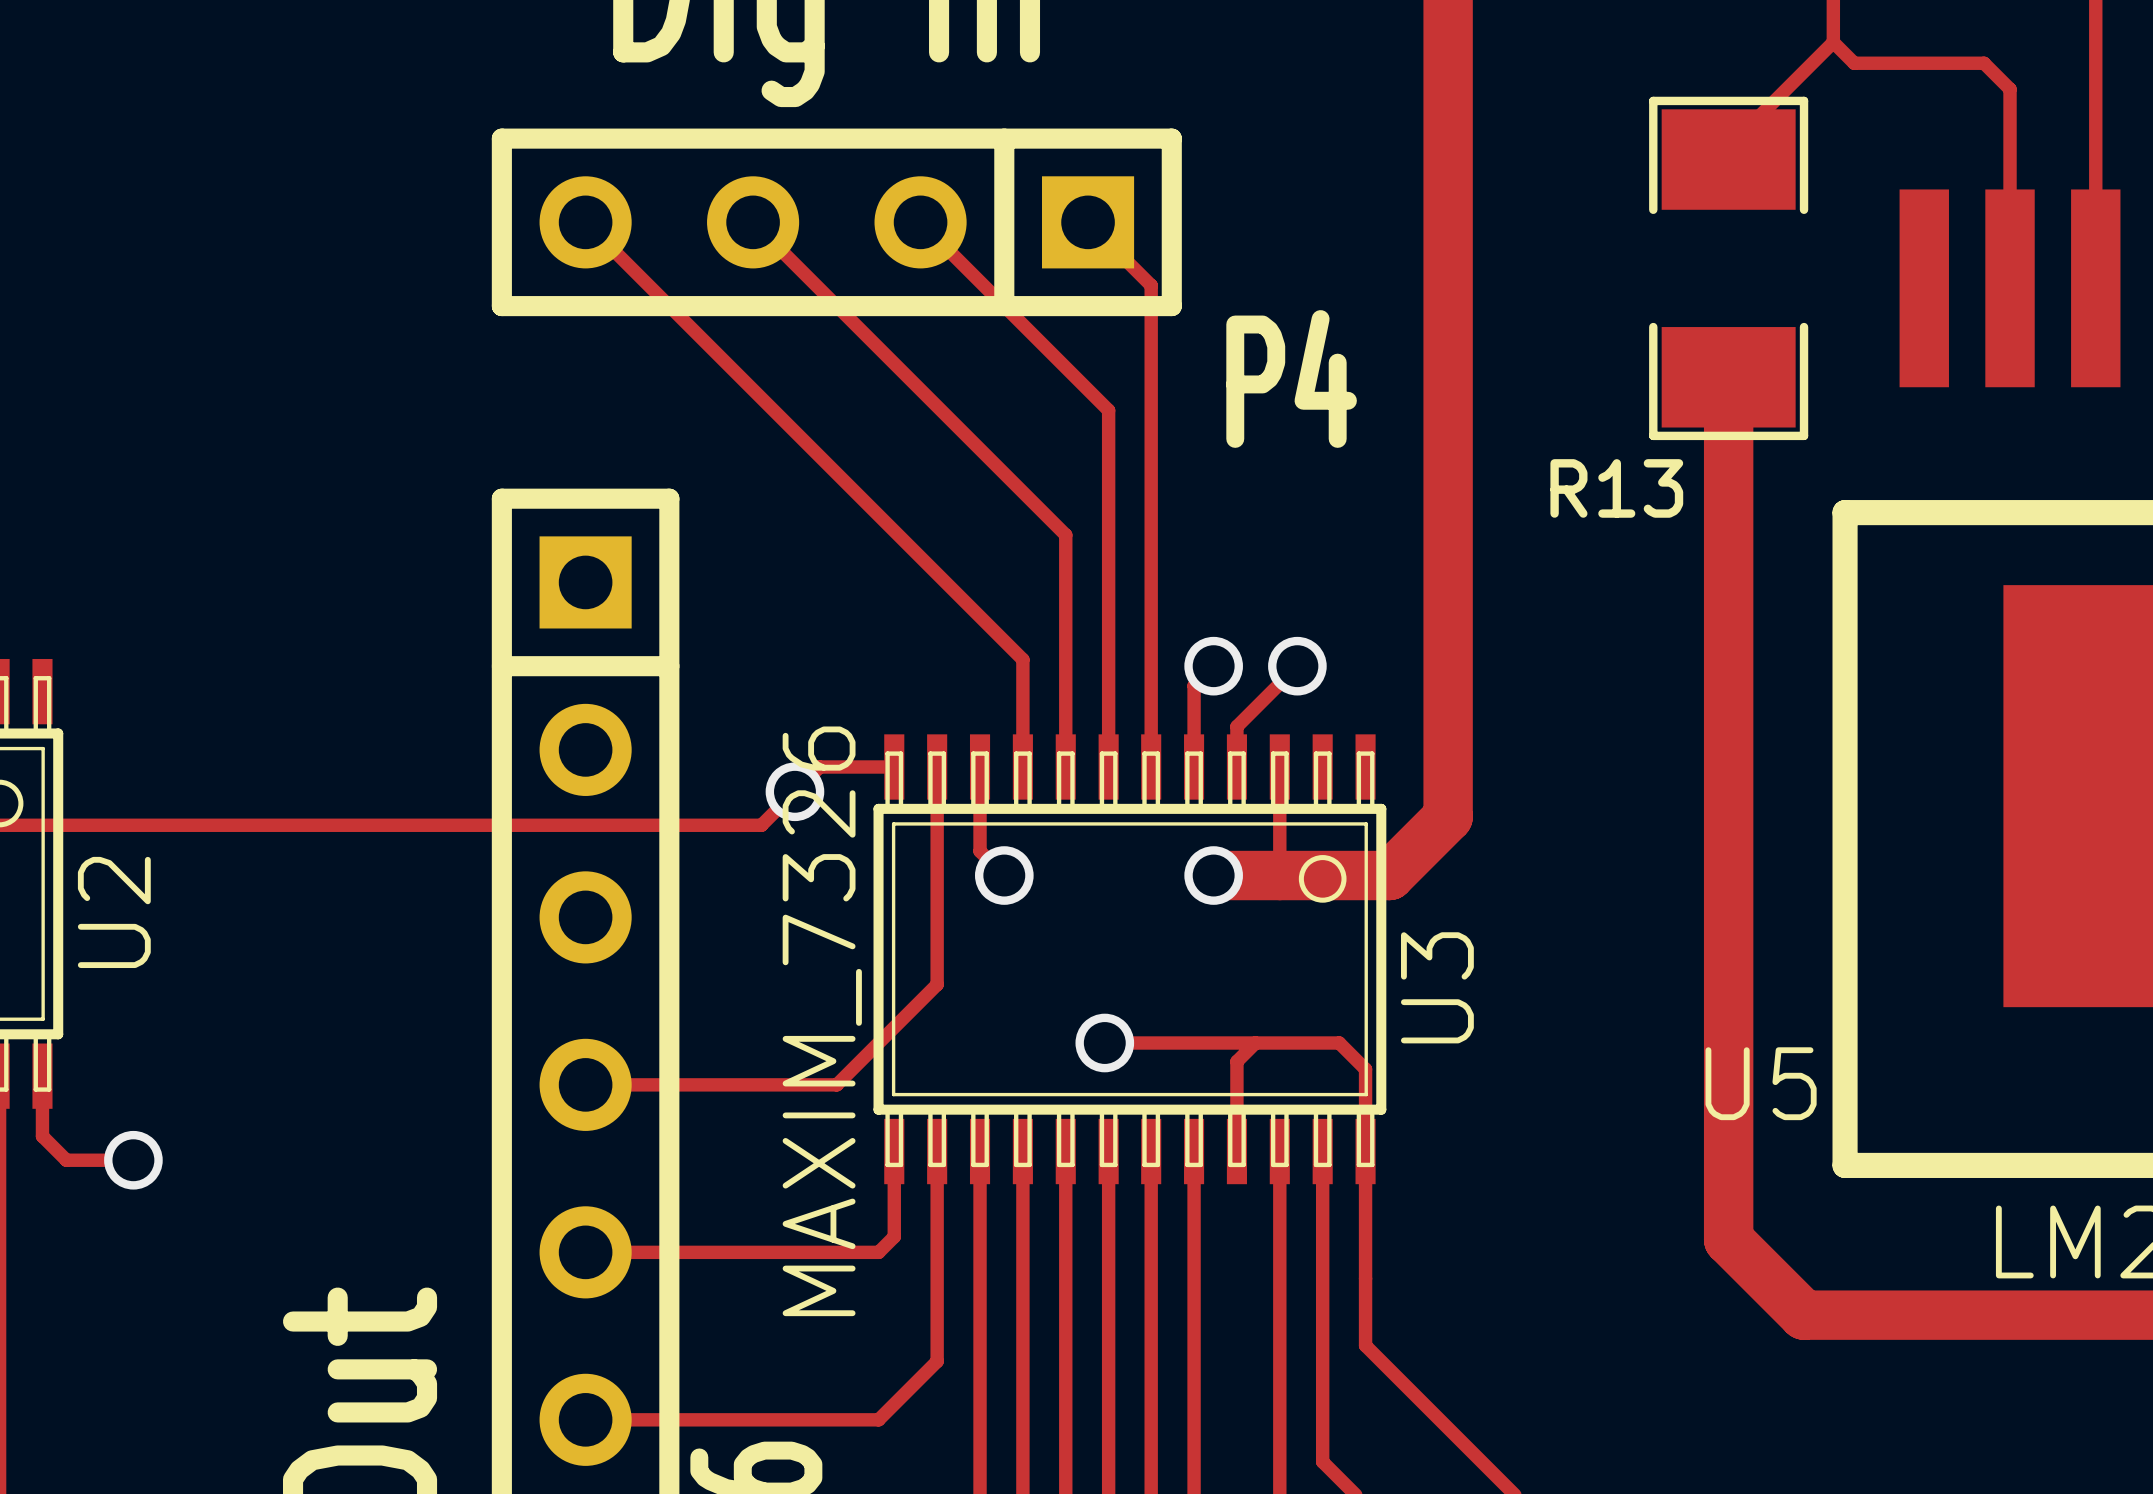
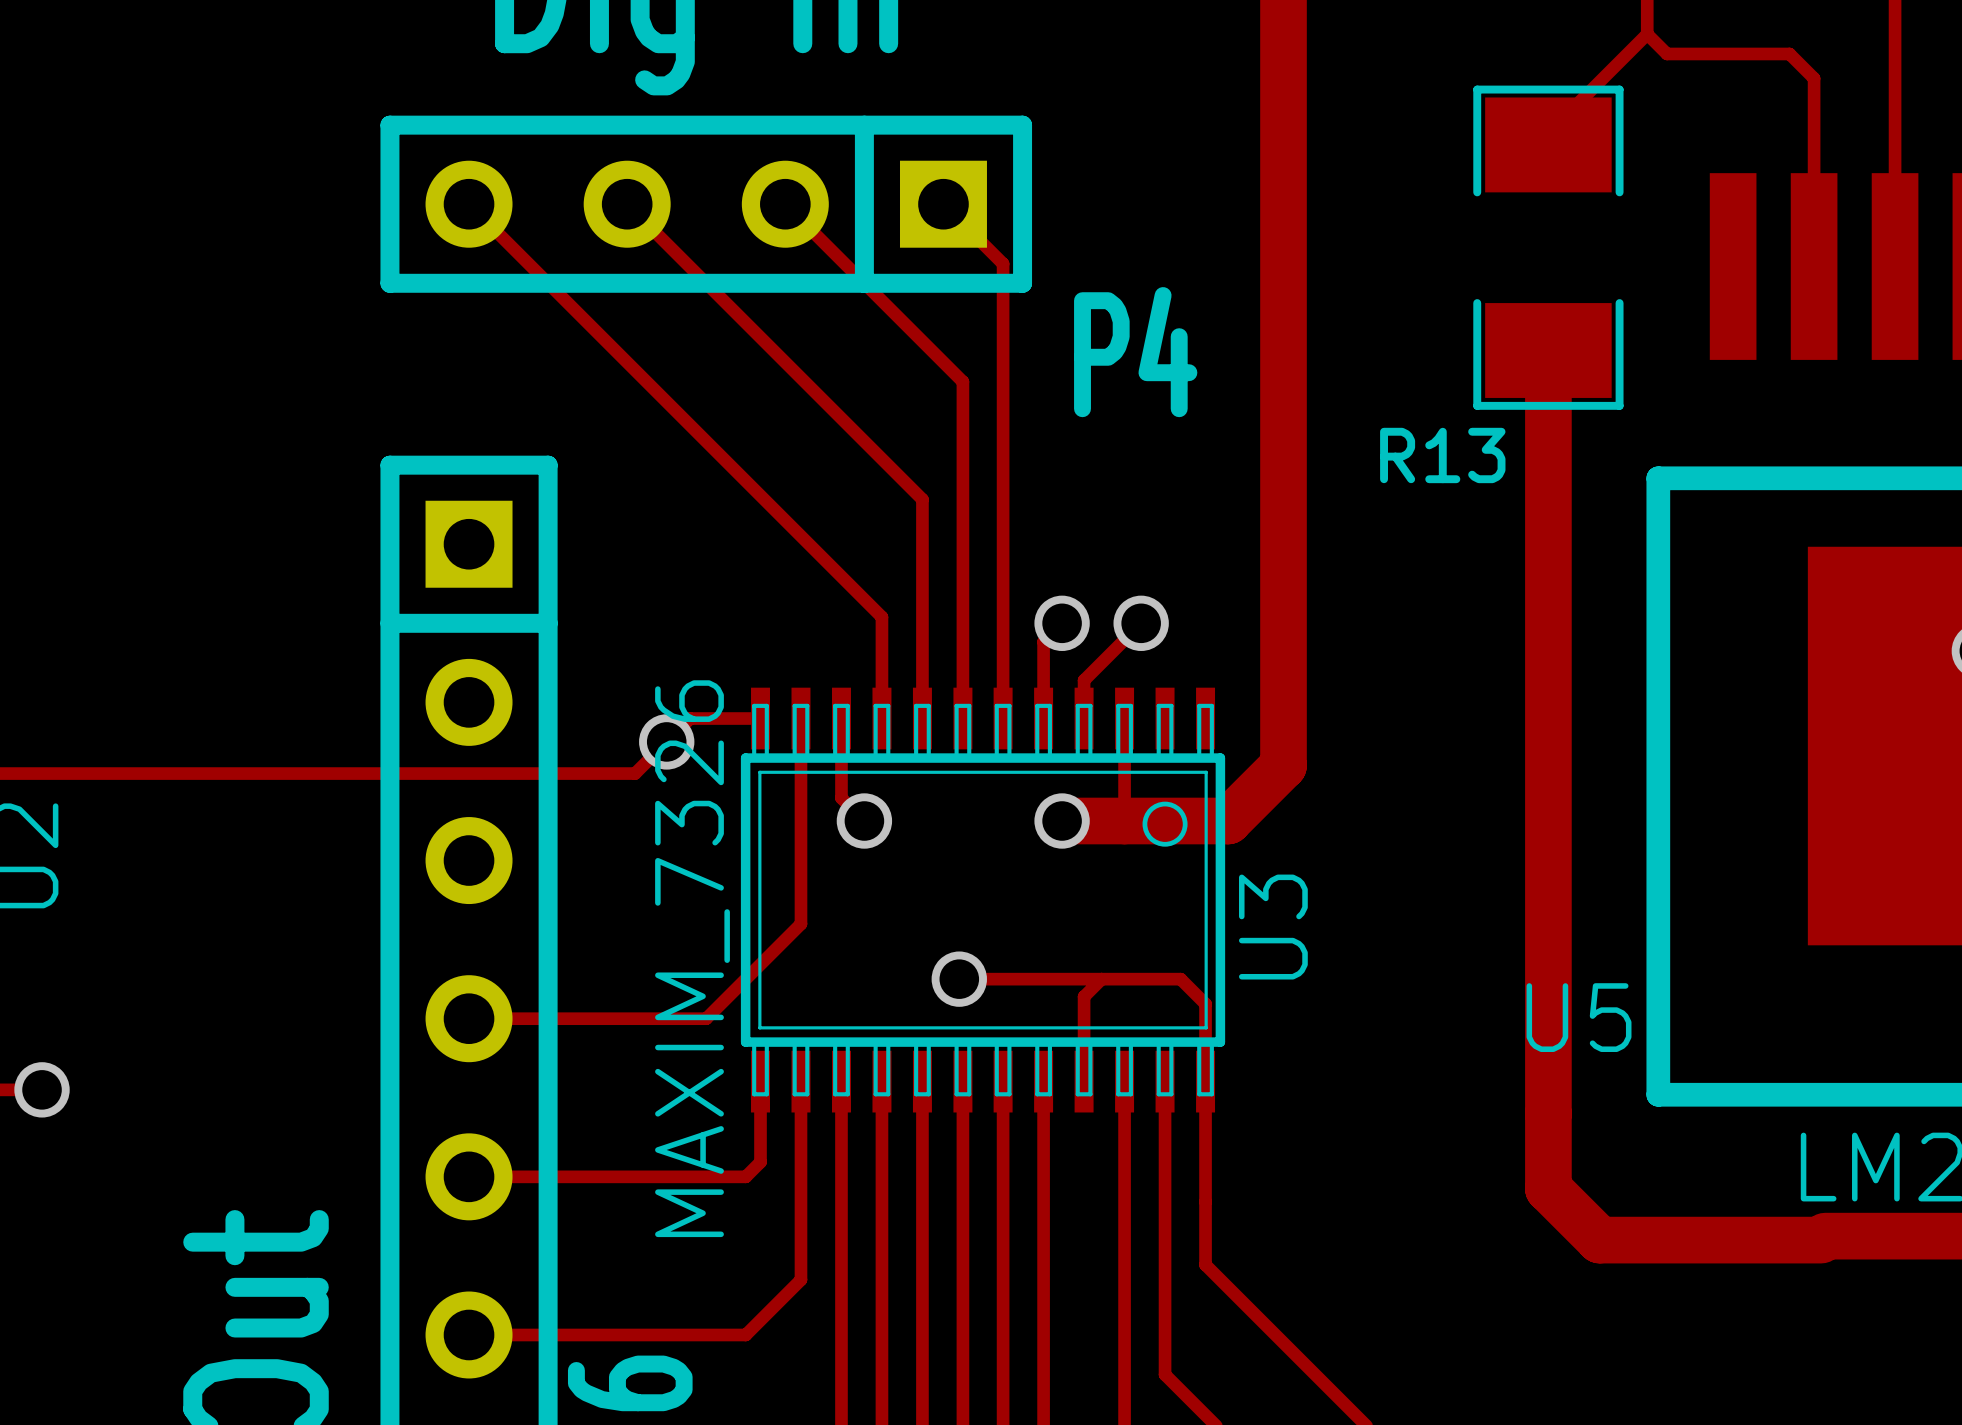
track: (1728, 1239) (1804, 1315) (2021, 1315) -> (1548, 1164) (1548, 1188) (1599, 1240) (1821, 1240)

